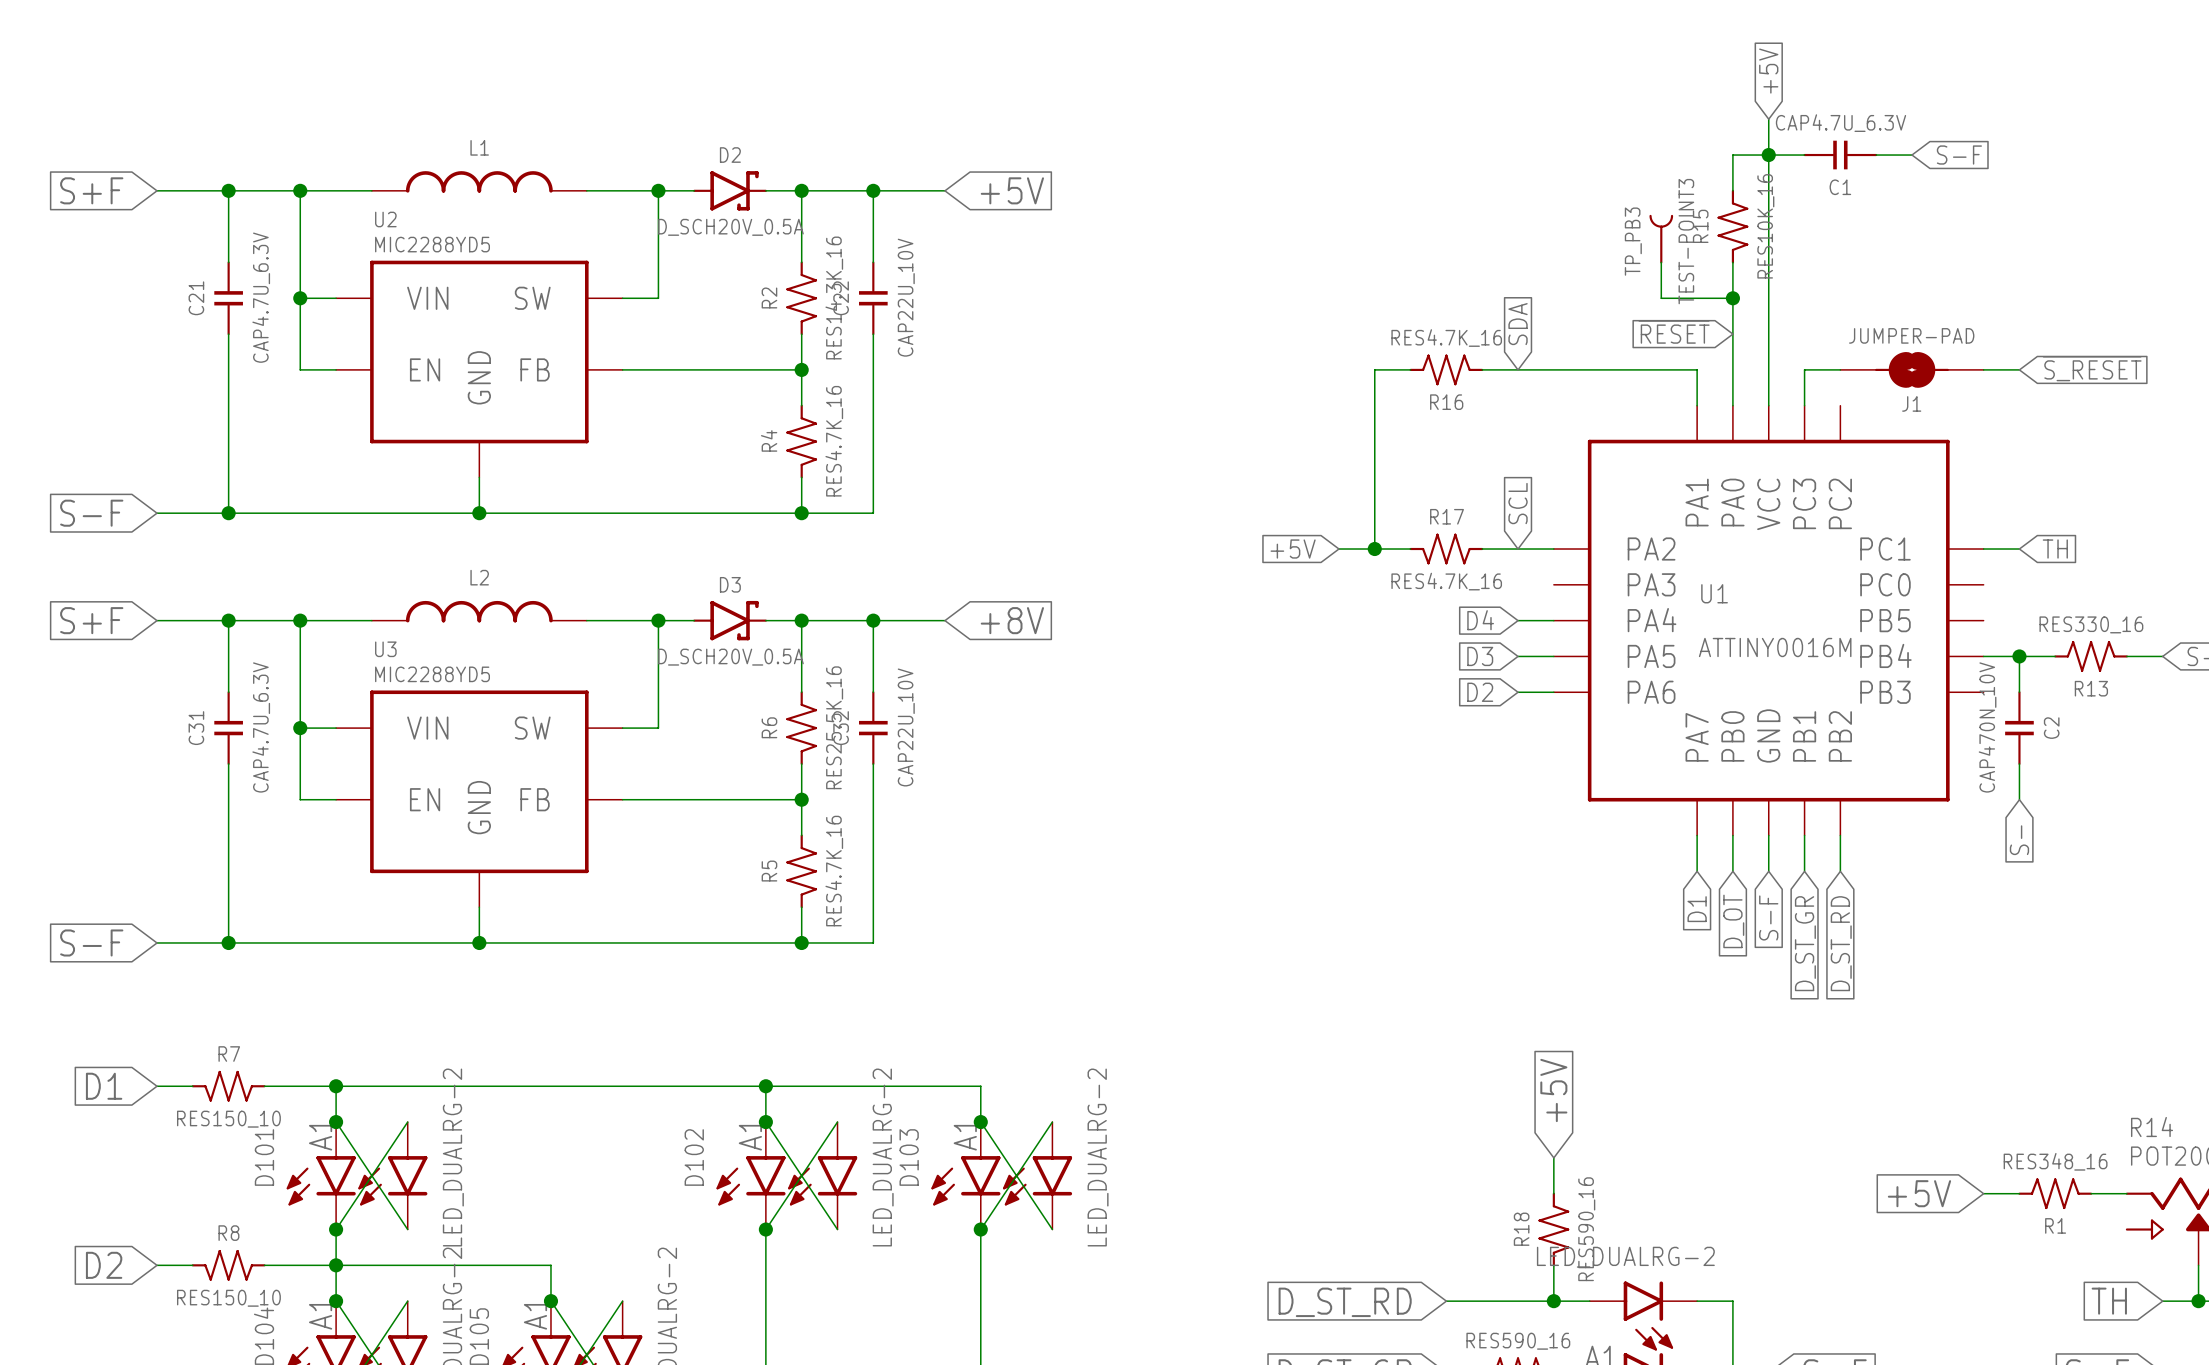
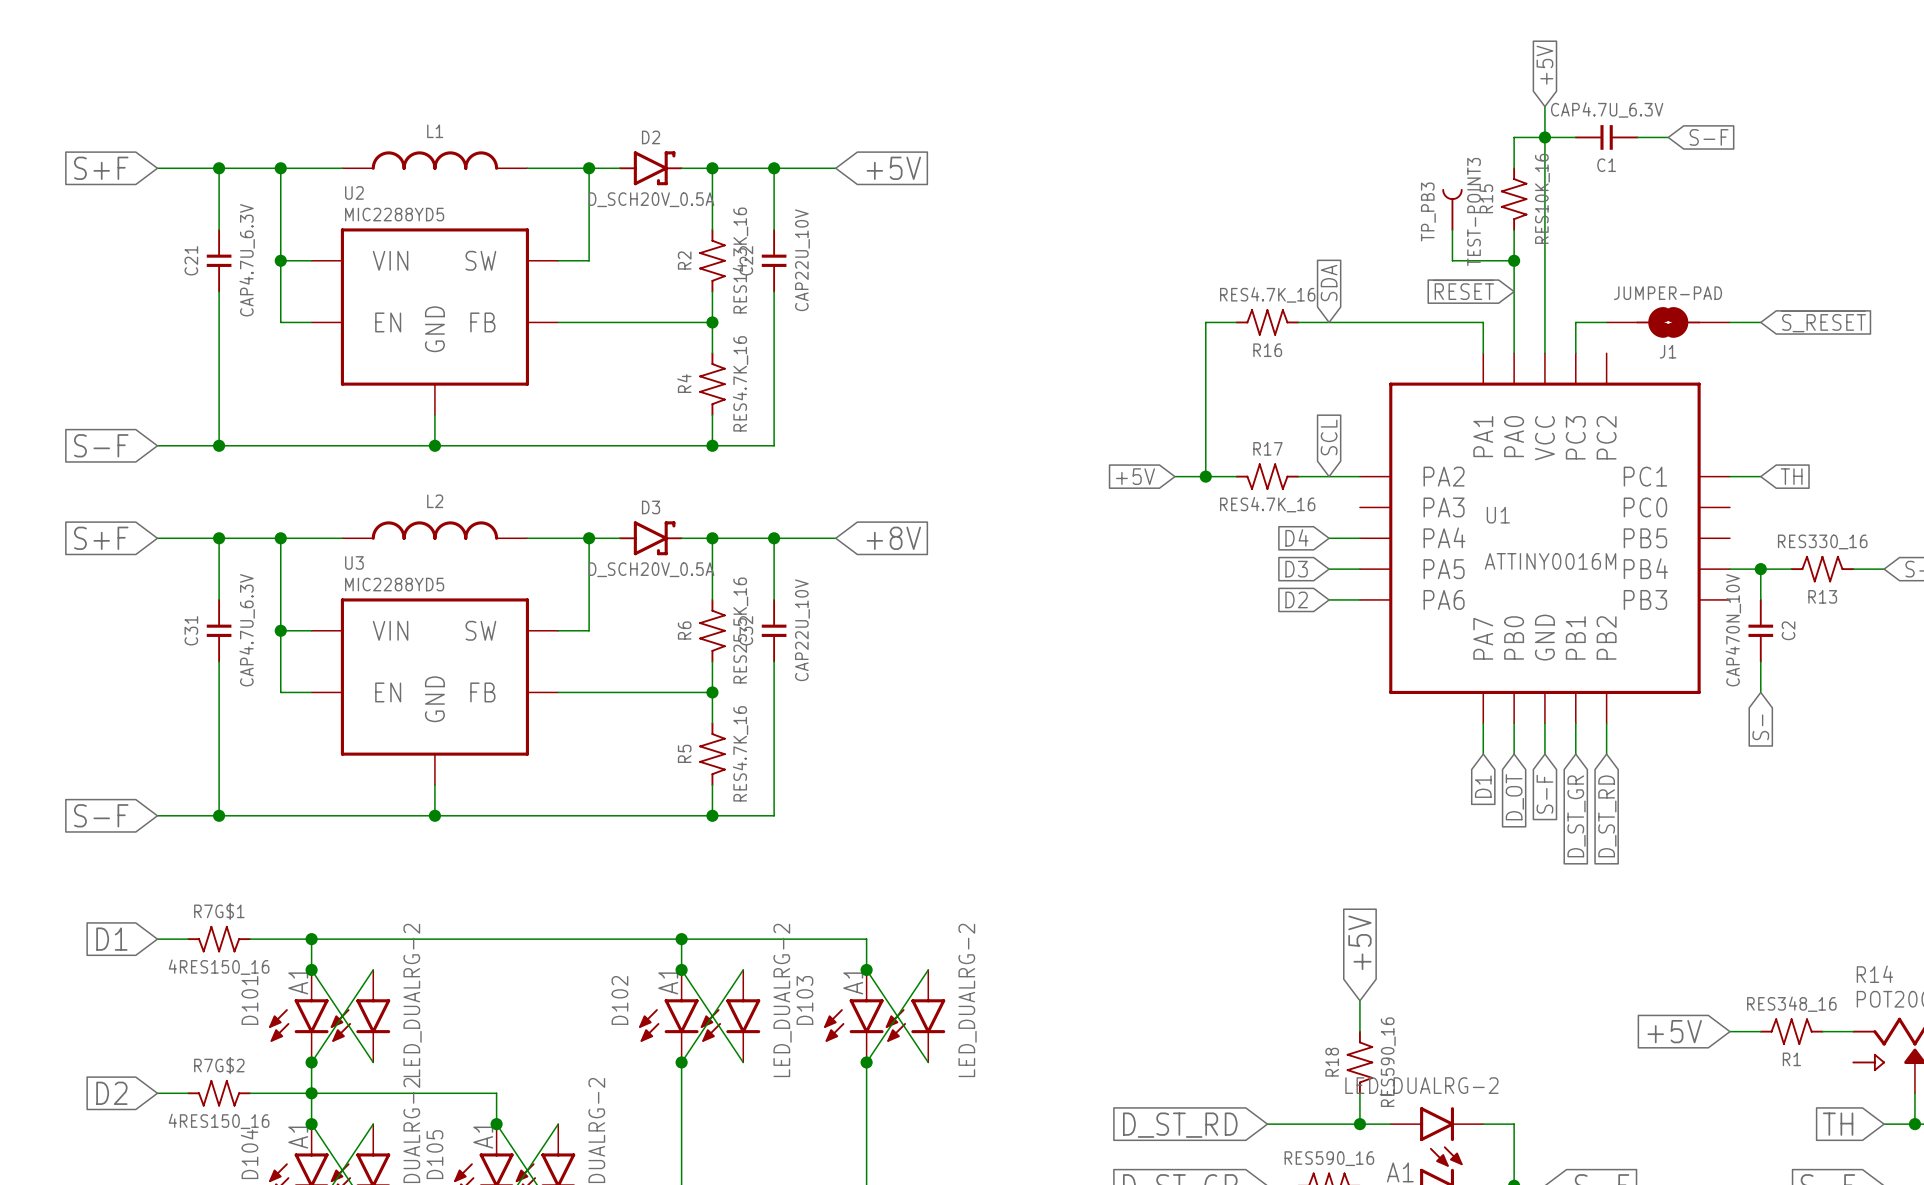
R7 name: R7 (229, 1054) -> R7G$1 (219, 911)
R7 value: RES150_10 (228, 1119) -> 4RES150_16 (219, 967)
R8 name: R8 (228, 1233) -> R7G$2 (219, 1065)
R8 value: RES150_10 (228, 1298) -> 4RES150_16 (219, 1121)

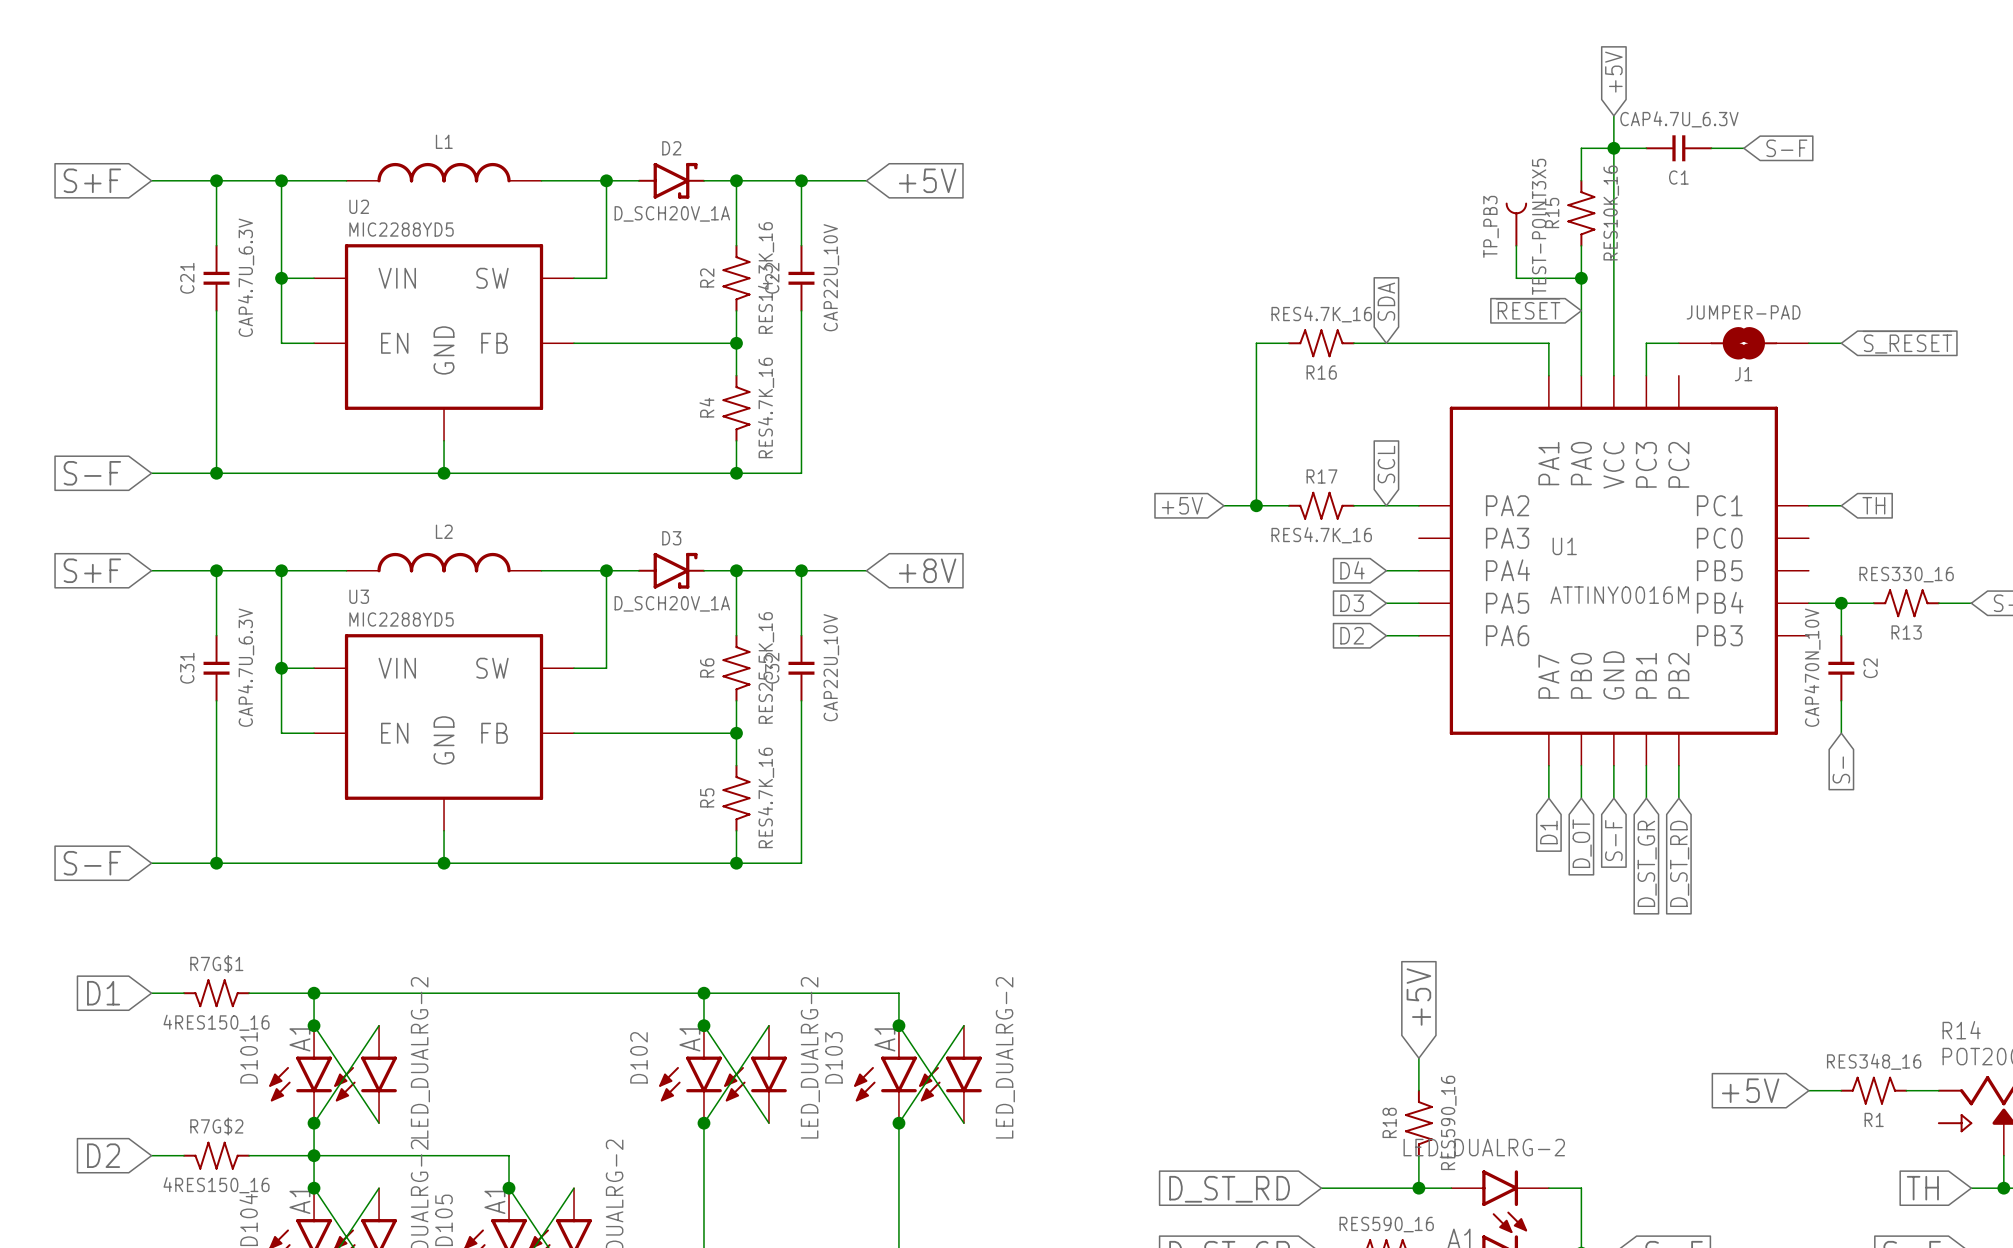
D2 value: D_SCH20V_0.5A (651, 199) -> D_SCH20V_1A (672, 213)
TP_PB3 value: TEST-POINT3 (1474, 211) -> TEST-POINT3X5 (1539, 226)
D3 value: D_SCH20V_0.5A (651, 569) -> D_SCH20V_1A (672, 603)

